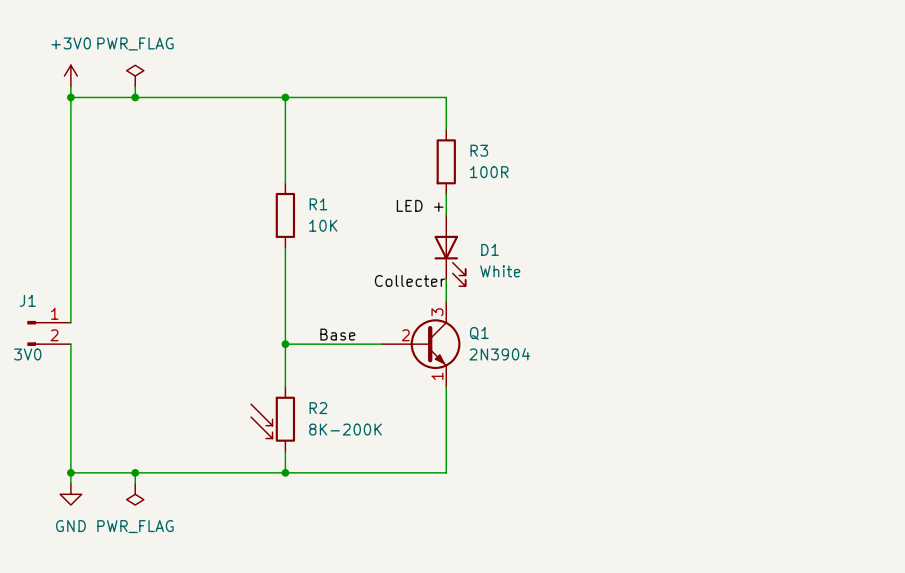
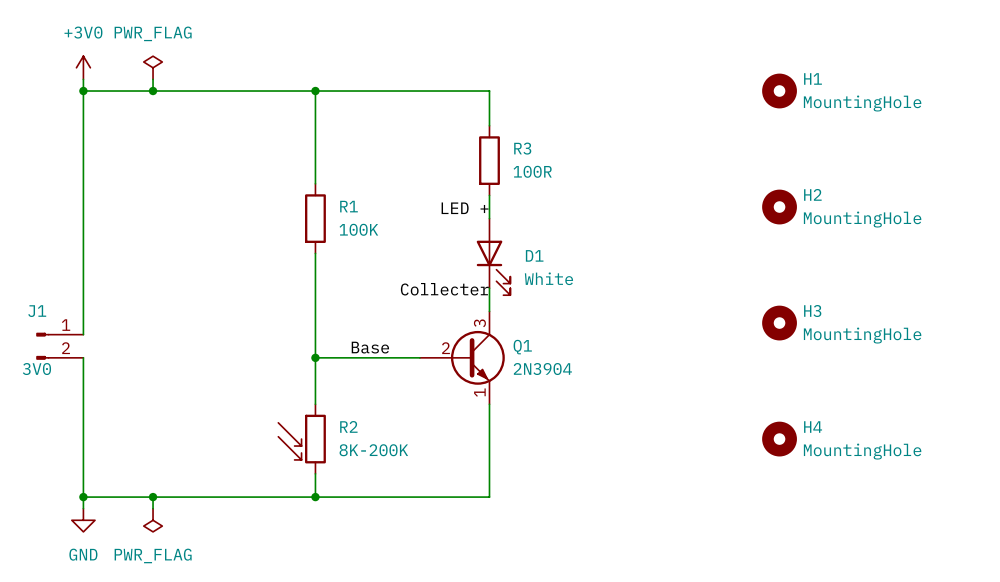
H1: none -> MountingHole (779, 91)
H2: none -> MountingHole (779, 207)
R1 value: 10K (323, 225) -> 100K (358, 229)
H3: none -> MountingHole (779, 323)
H4: none -> MountingHole (779, 439)

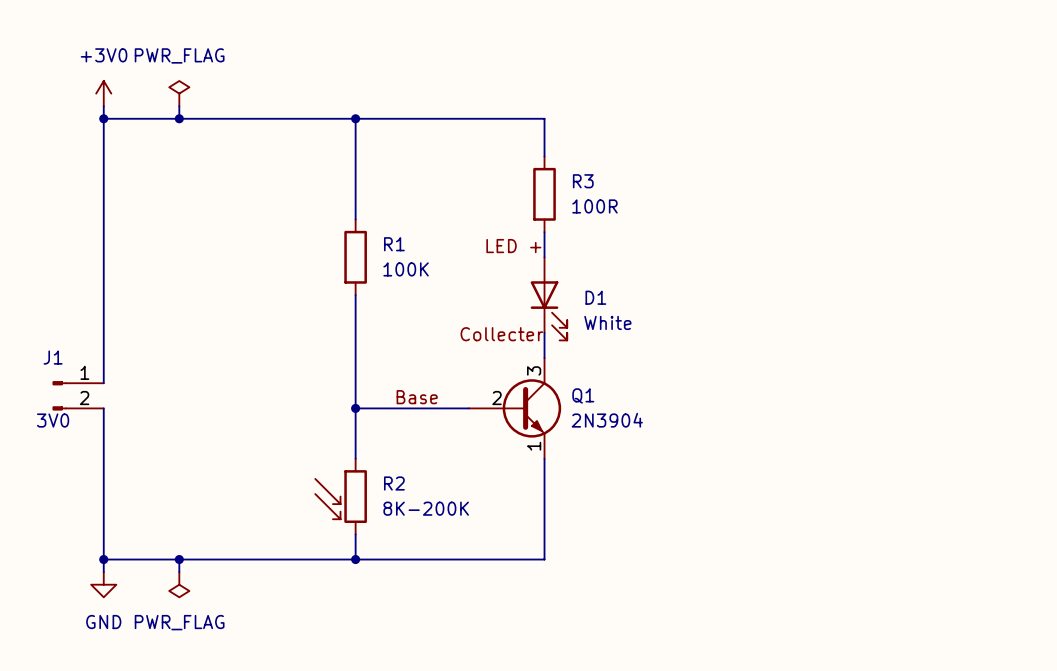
H1: MountingHole (779, 91) -> none
H2: MountingHole (779, 207) -> none
H3: MountingHole (779, 323) -> none
H4: MountingHole (779, 439) -> none

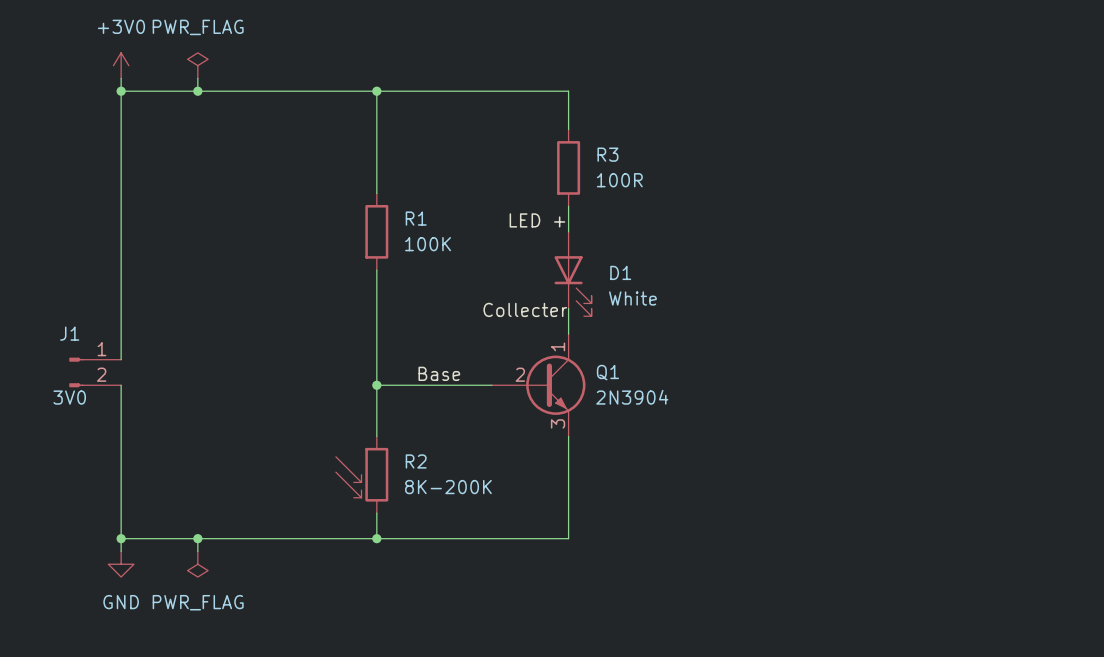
Q1 pin number: 3 (534, 370) -> 1 (558, 346)
Q1 pin number: 1 (534, 446) -> 3 (558, 423)

